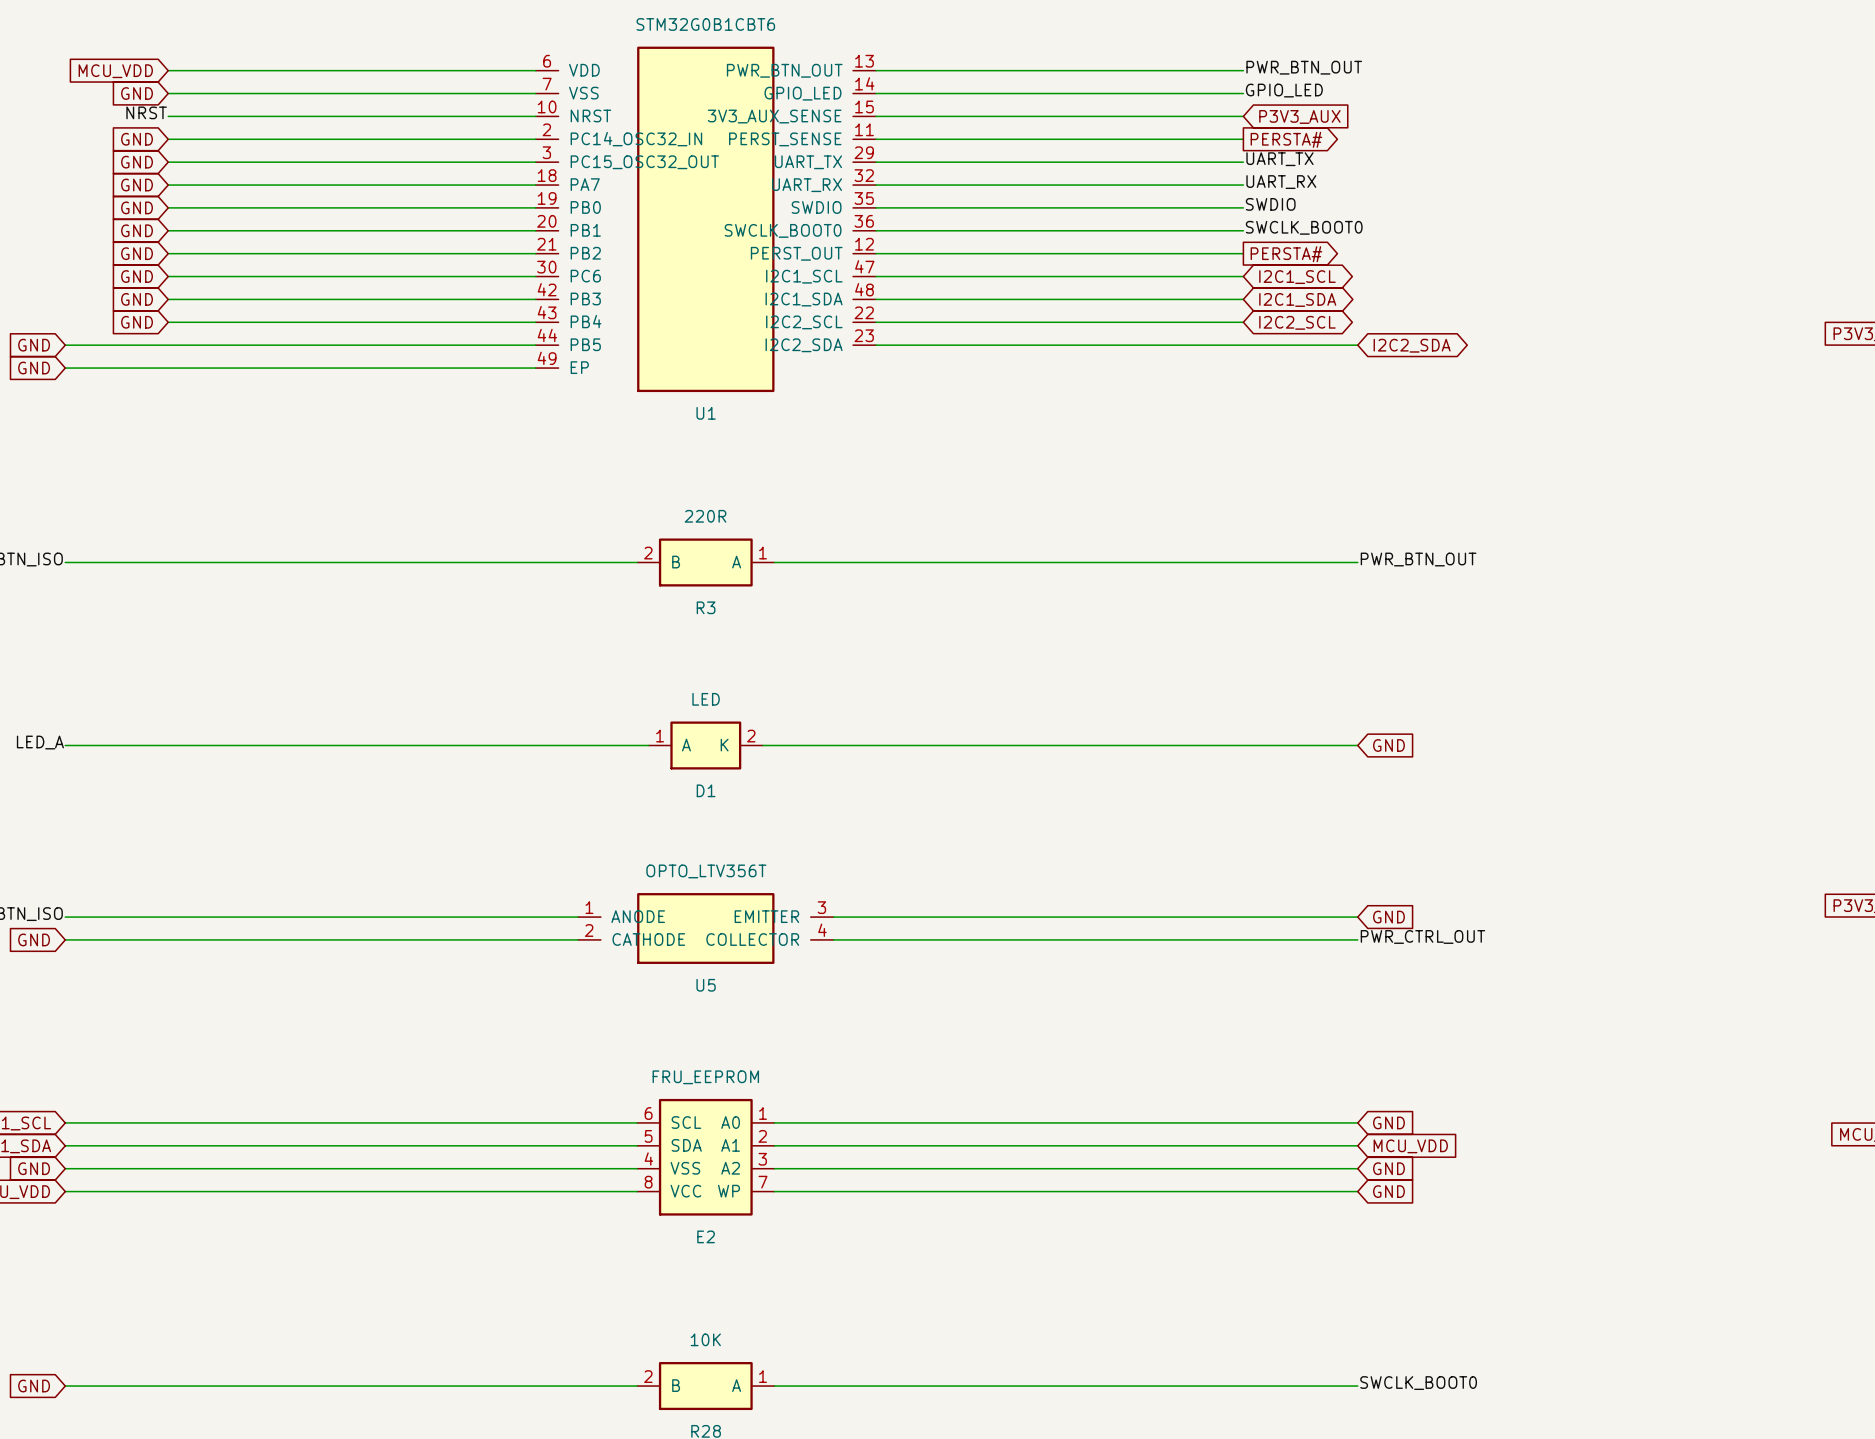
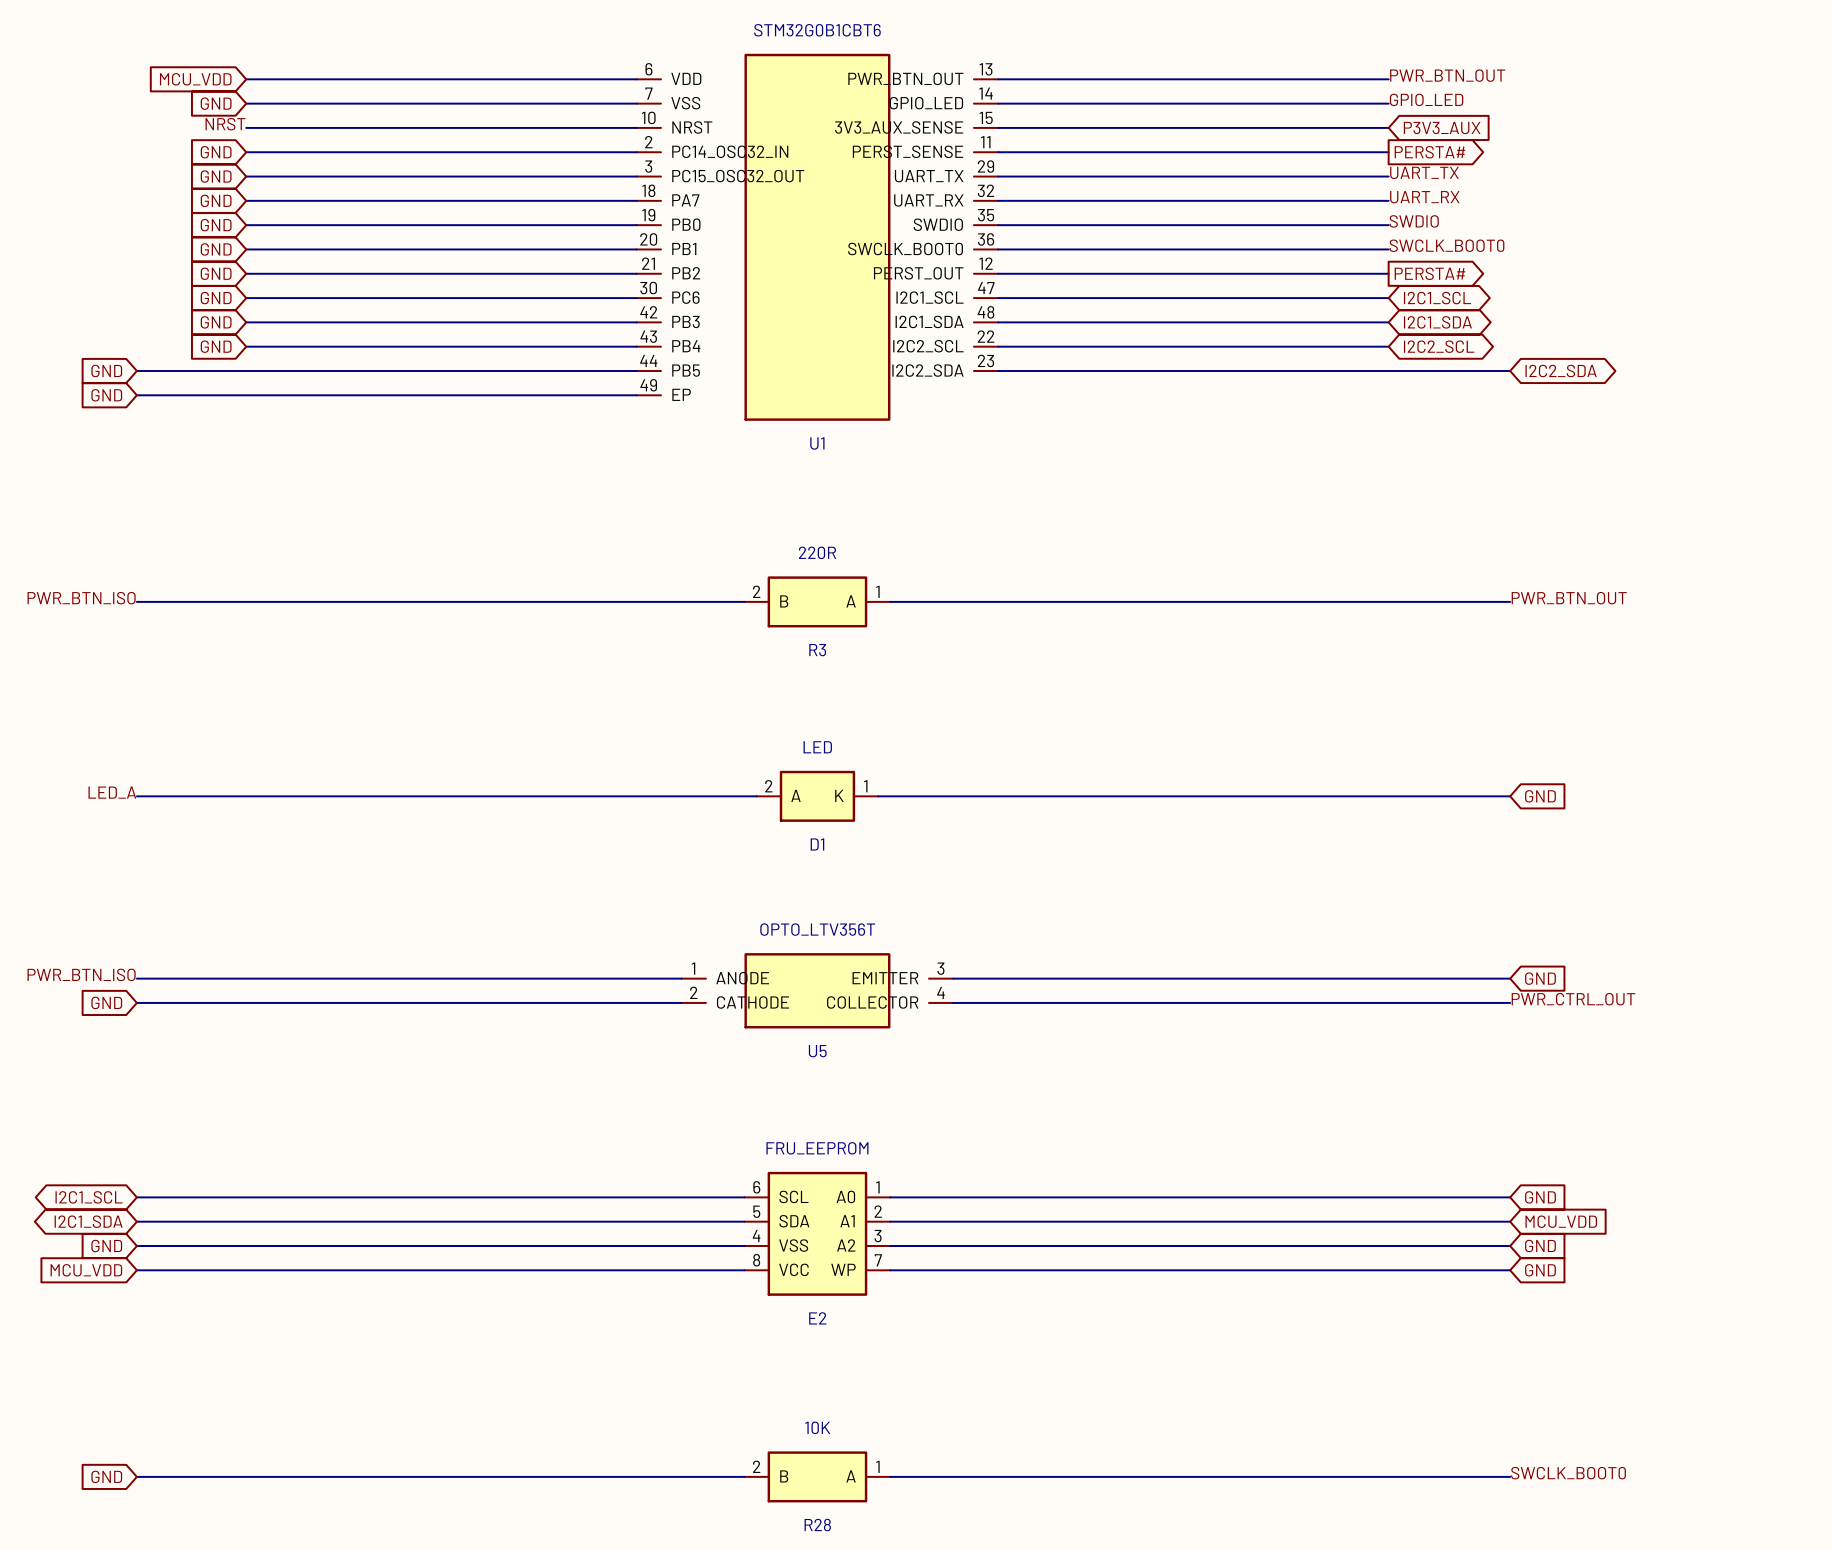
D1 pin number: 1 (660, 736) -> 2 (768, 786)
D1 pin number: 2 (751, 736) -> 1 (865, 786)

